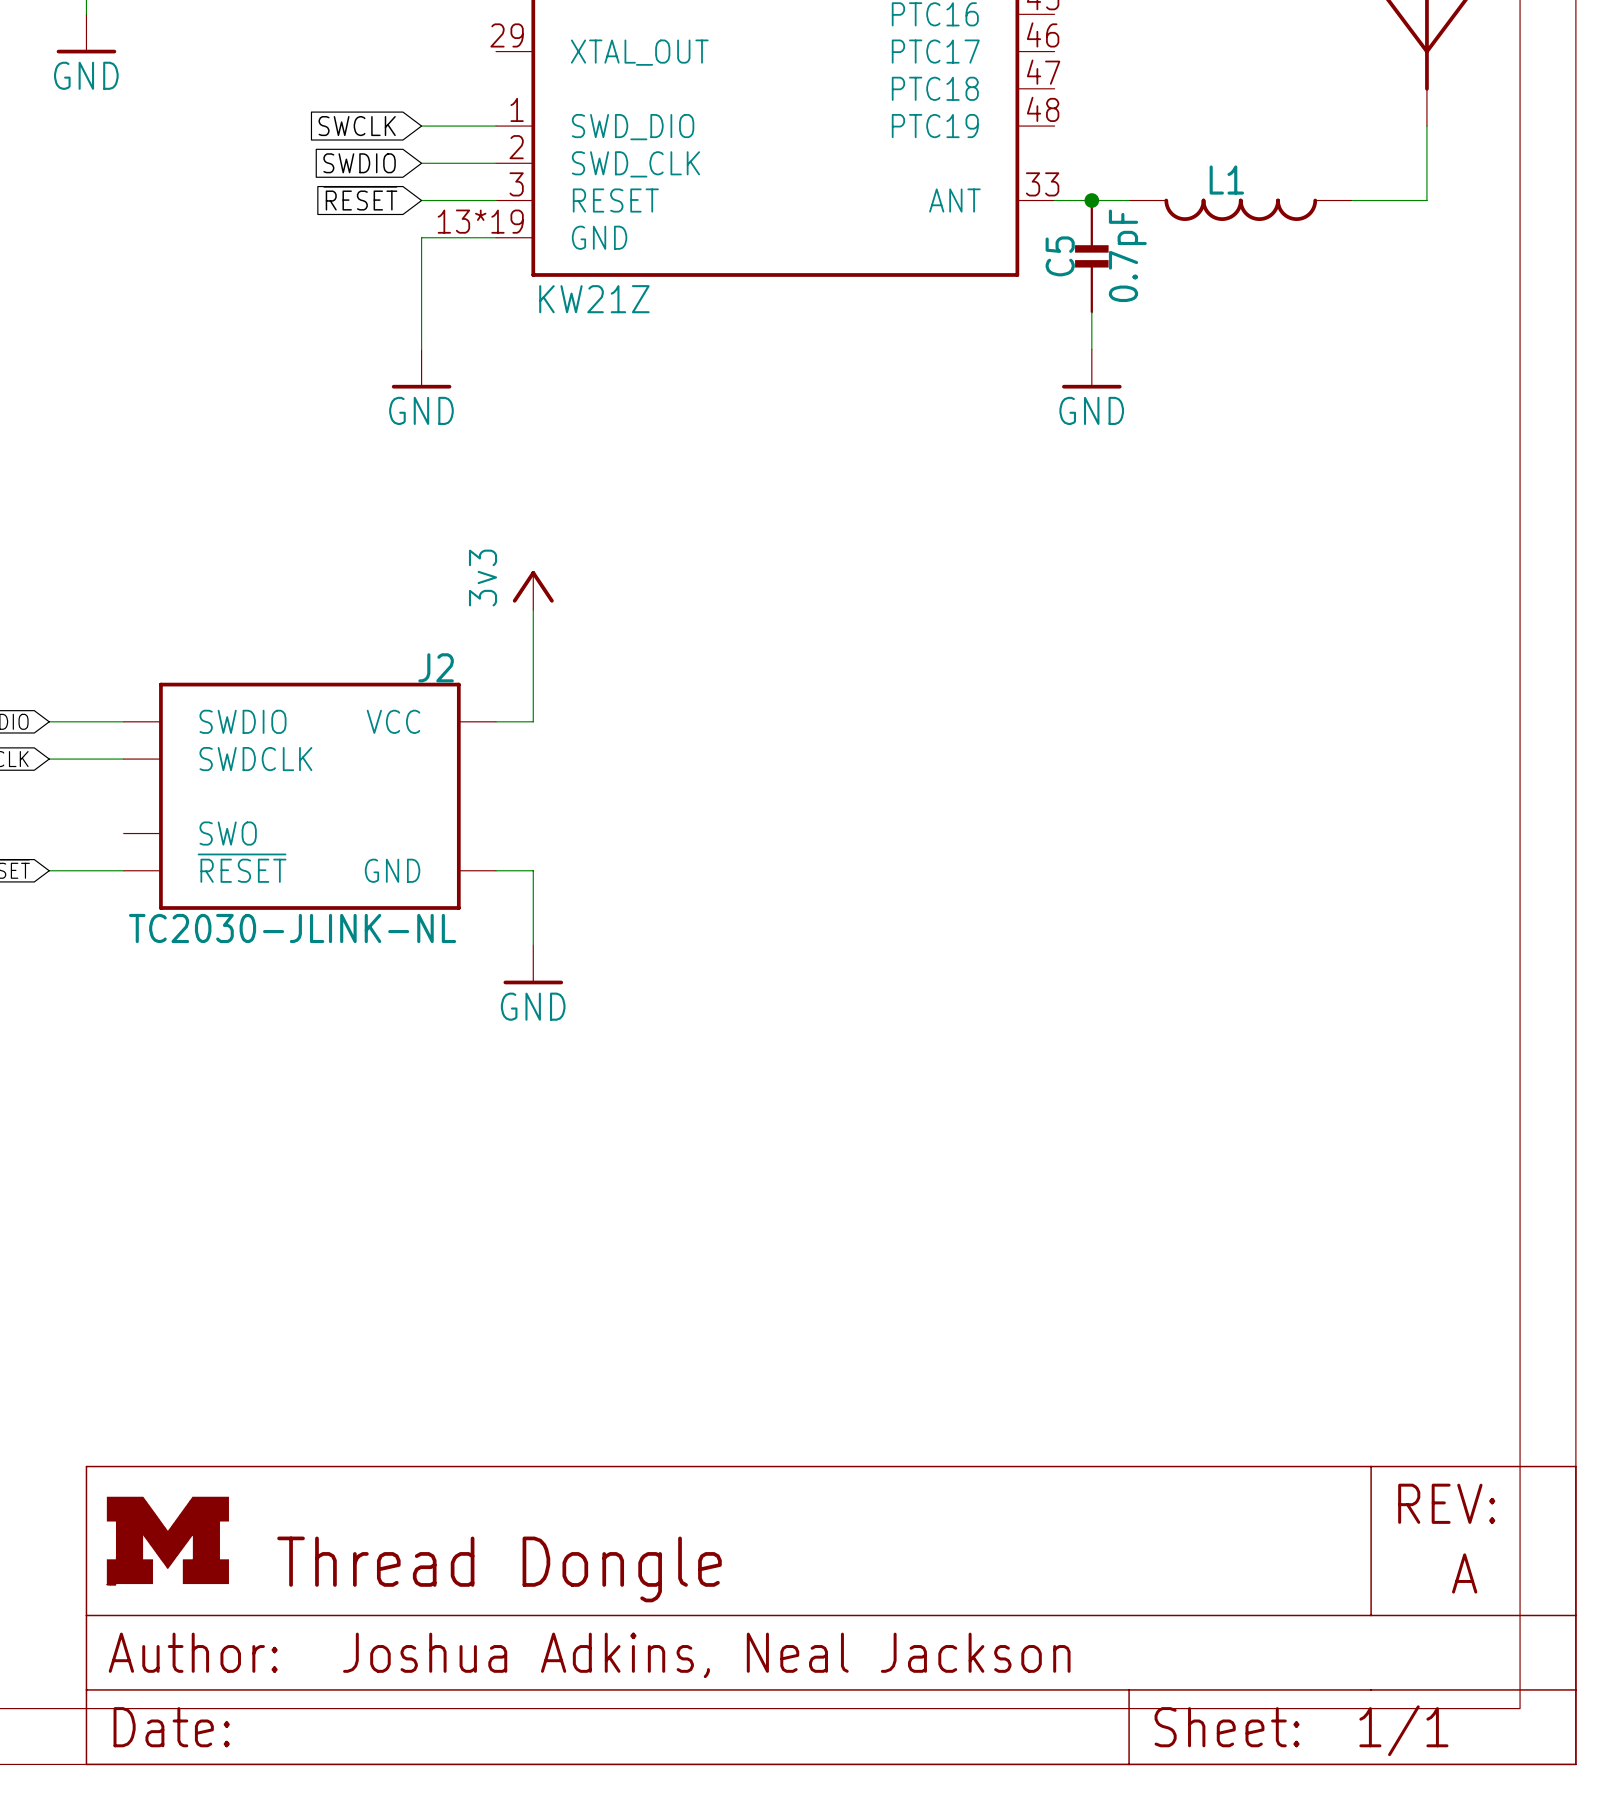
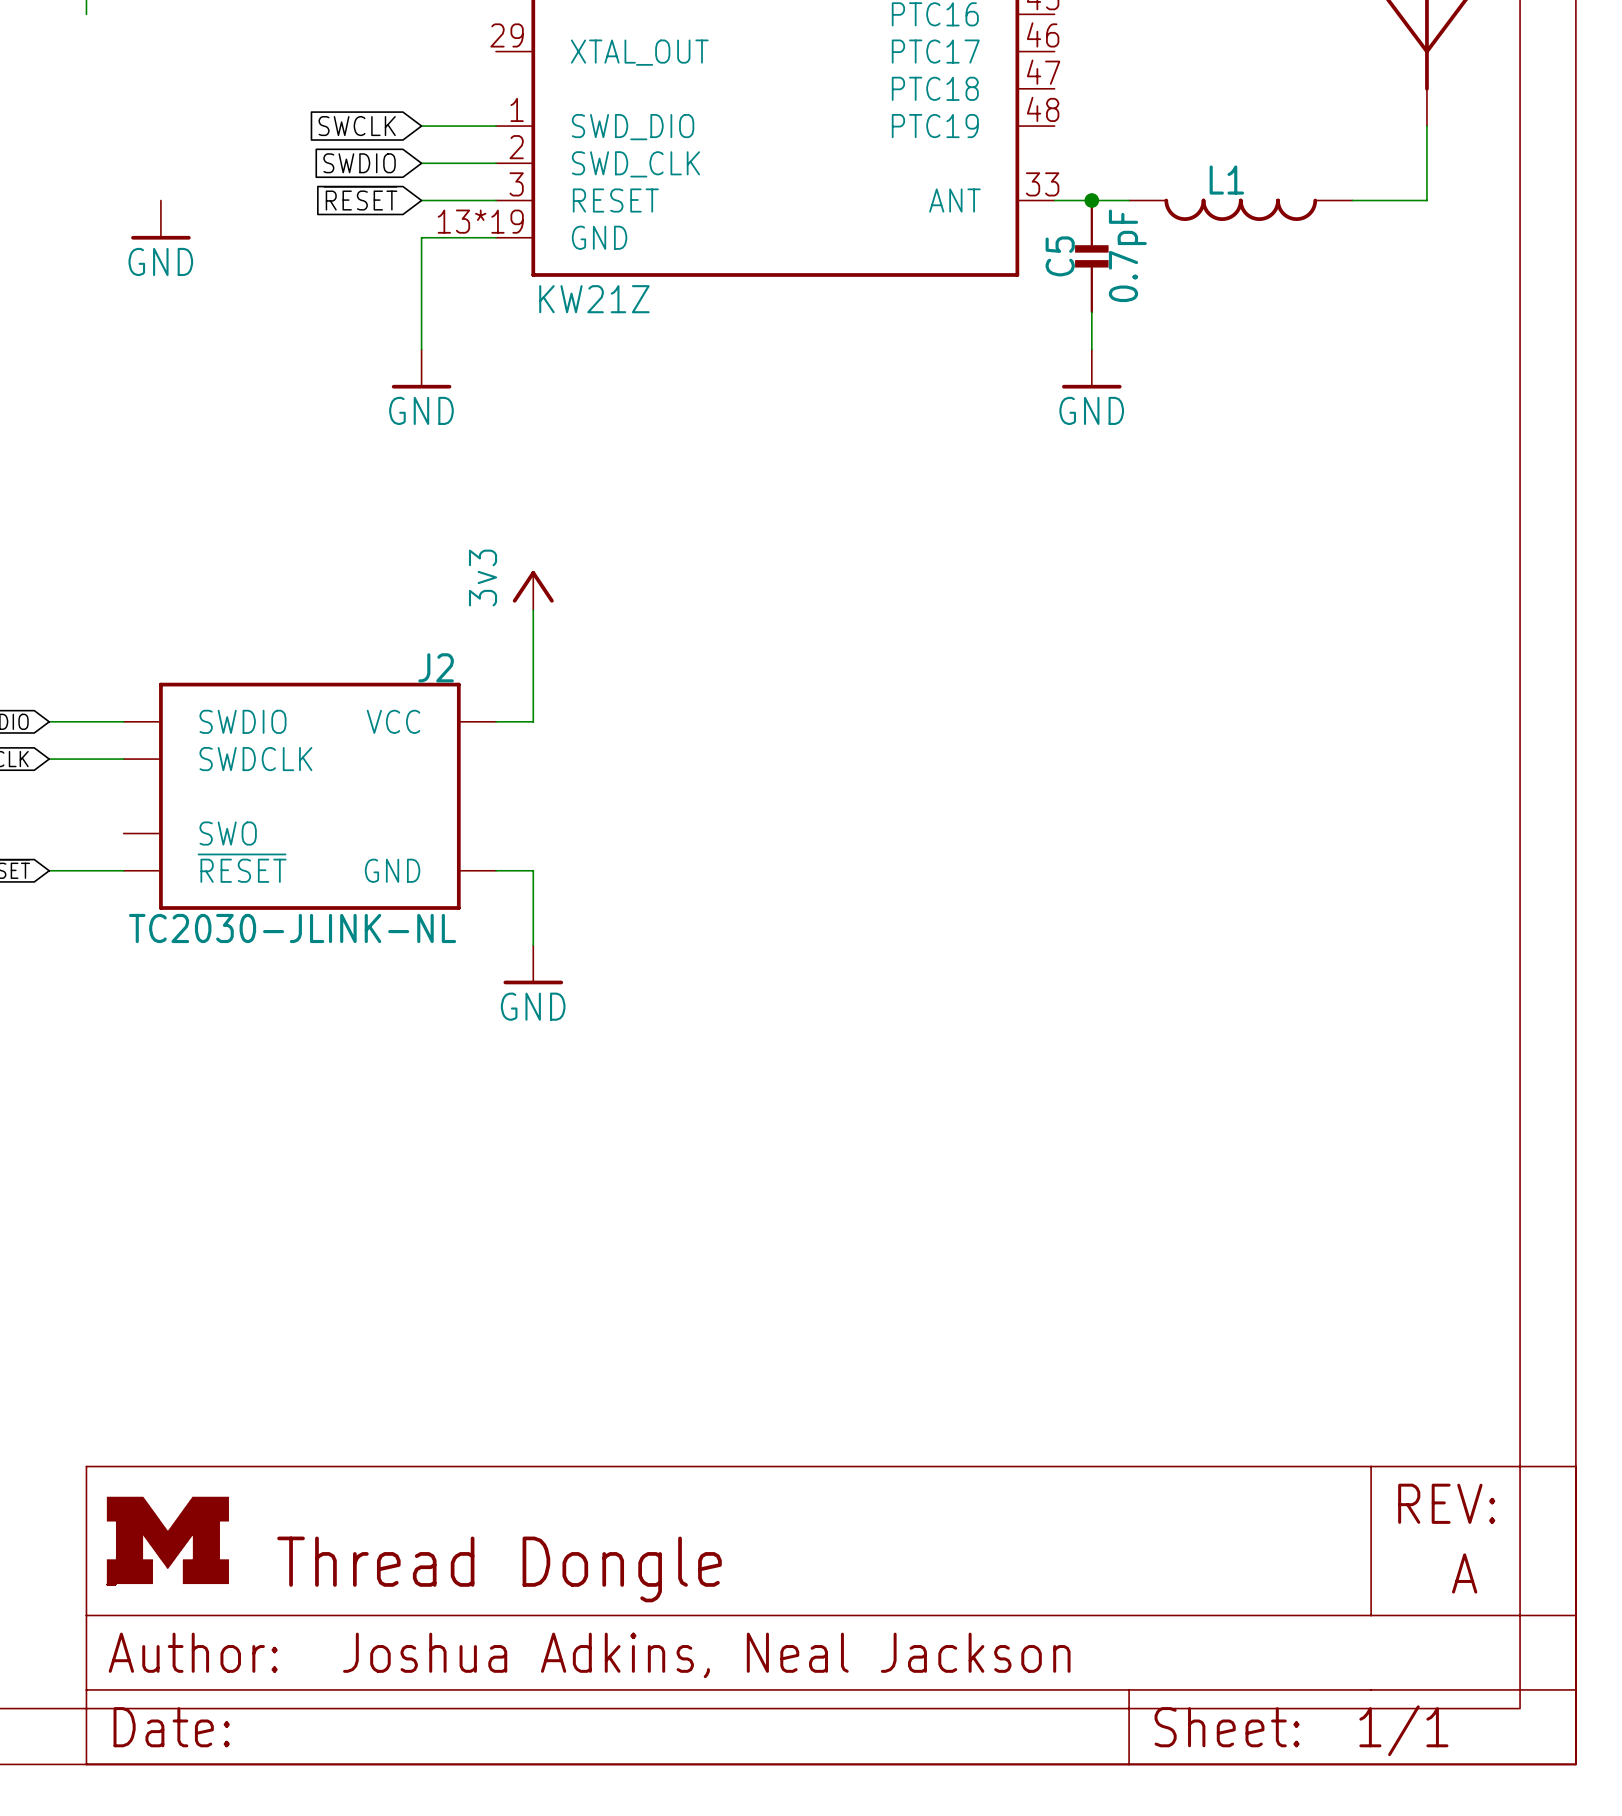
power symbol position: GND (86, 33) -> GND (160, 220)

